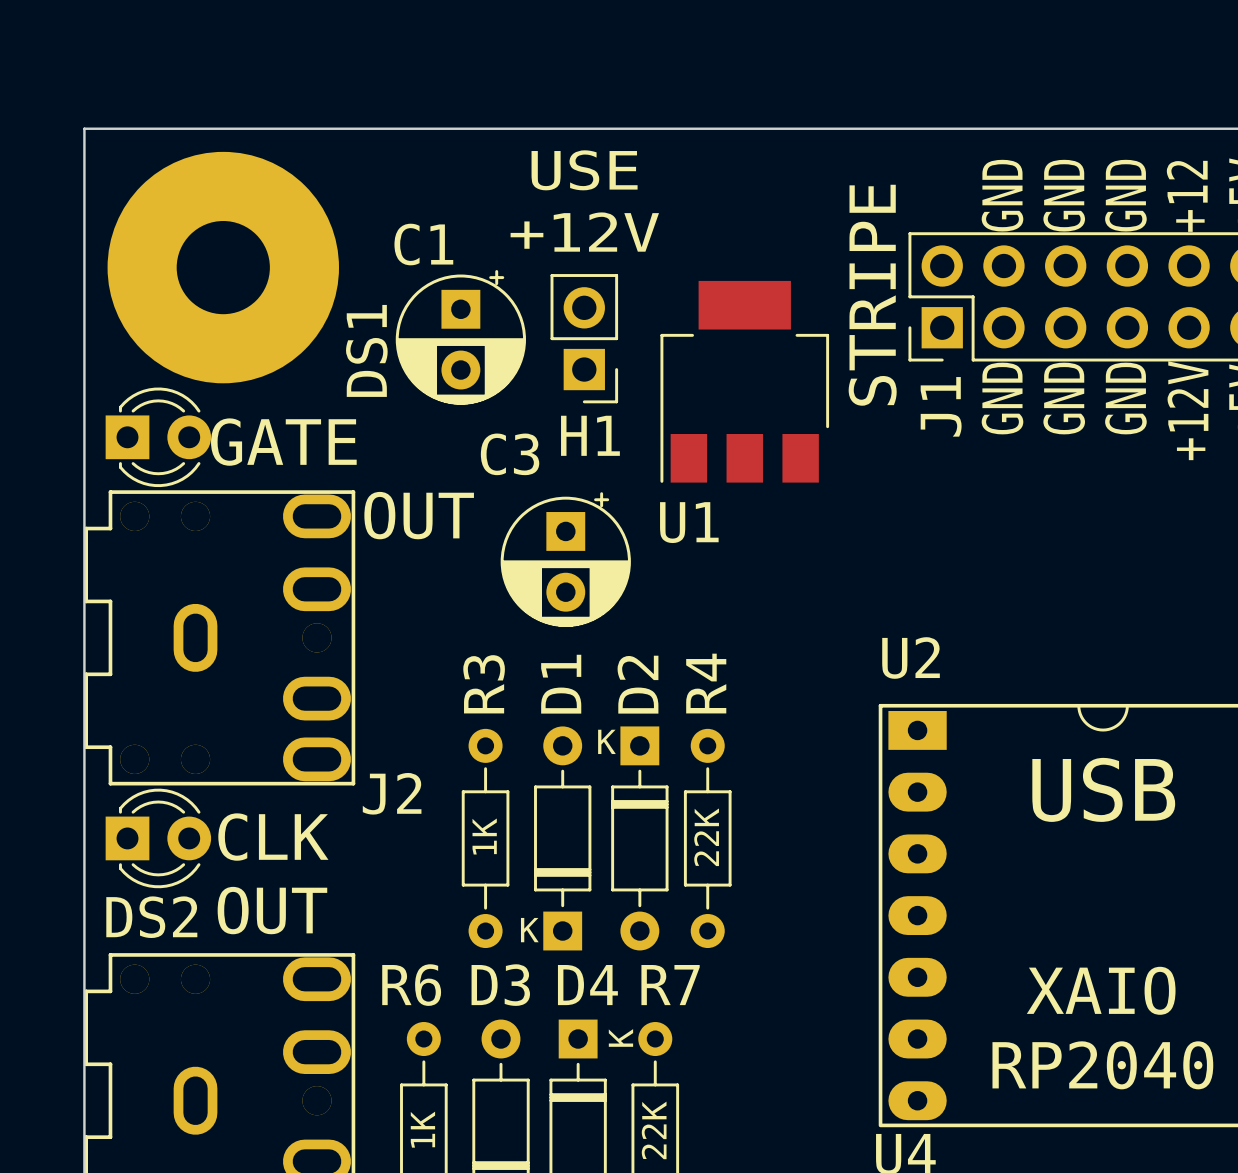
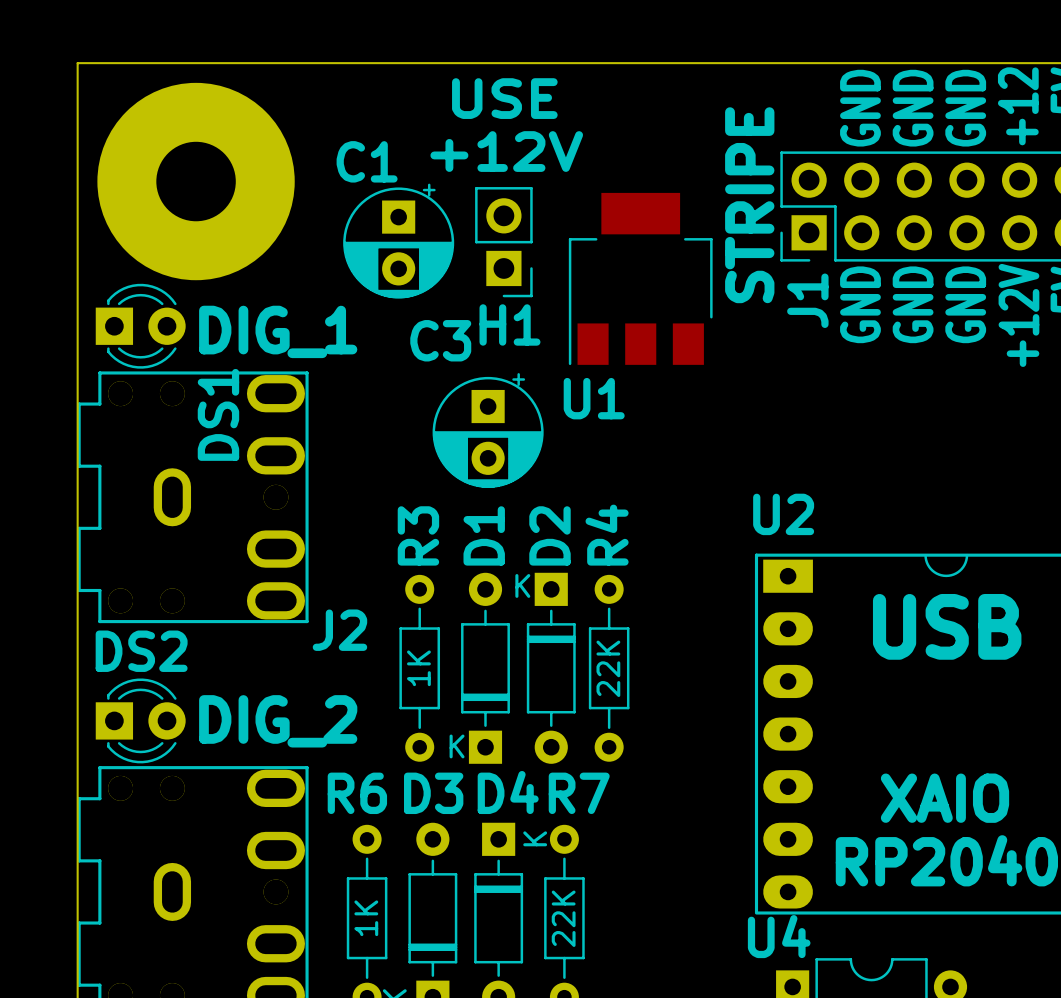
DS1 name position: DS1 (366, 350) -> DS1 (218, 414)
text: GATE (283, 442) -> DIG_1 (278, 331)
text: OUT (419, 515) -> none
text: CLK (273, 837) -> none
DS2 position: (158, 838) -> (140, 720)
text: OUT (272, 910) -> DIG_2 (278, 721)
DS2 name position: DS2 (151, 917) -> DS2 (141, 651)

